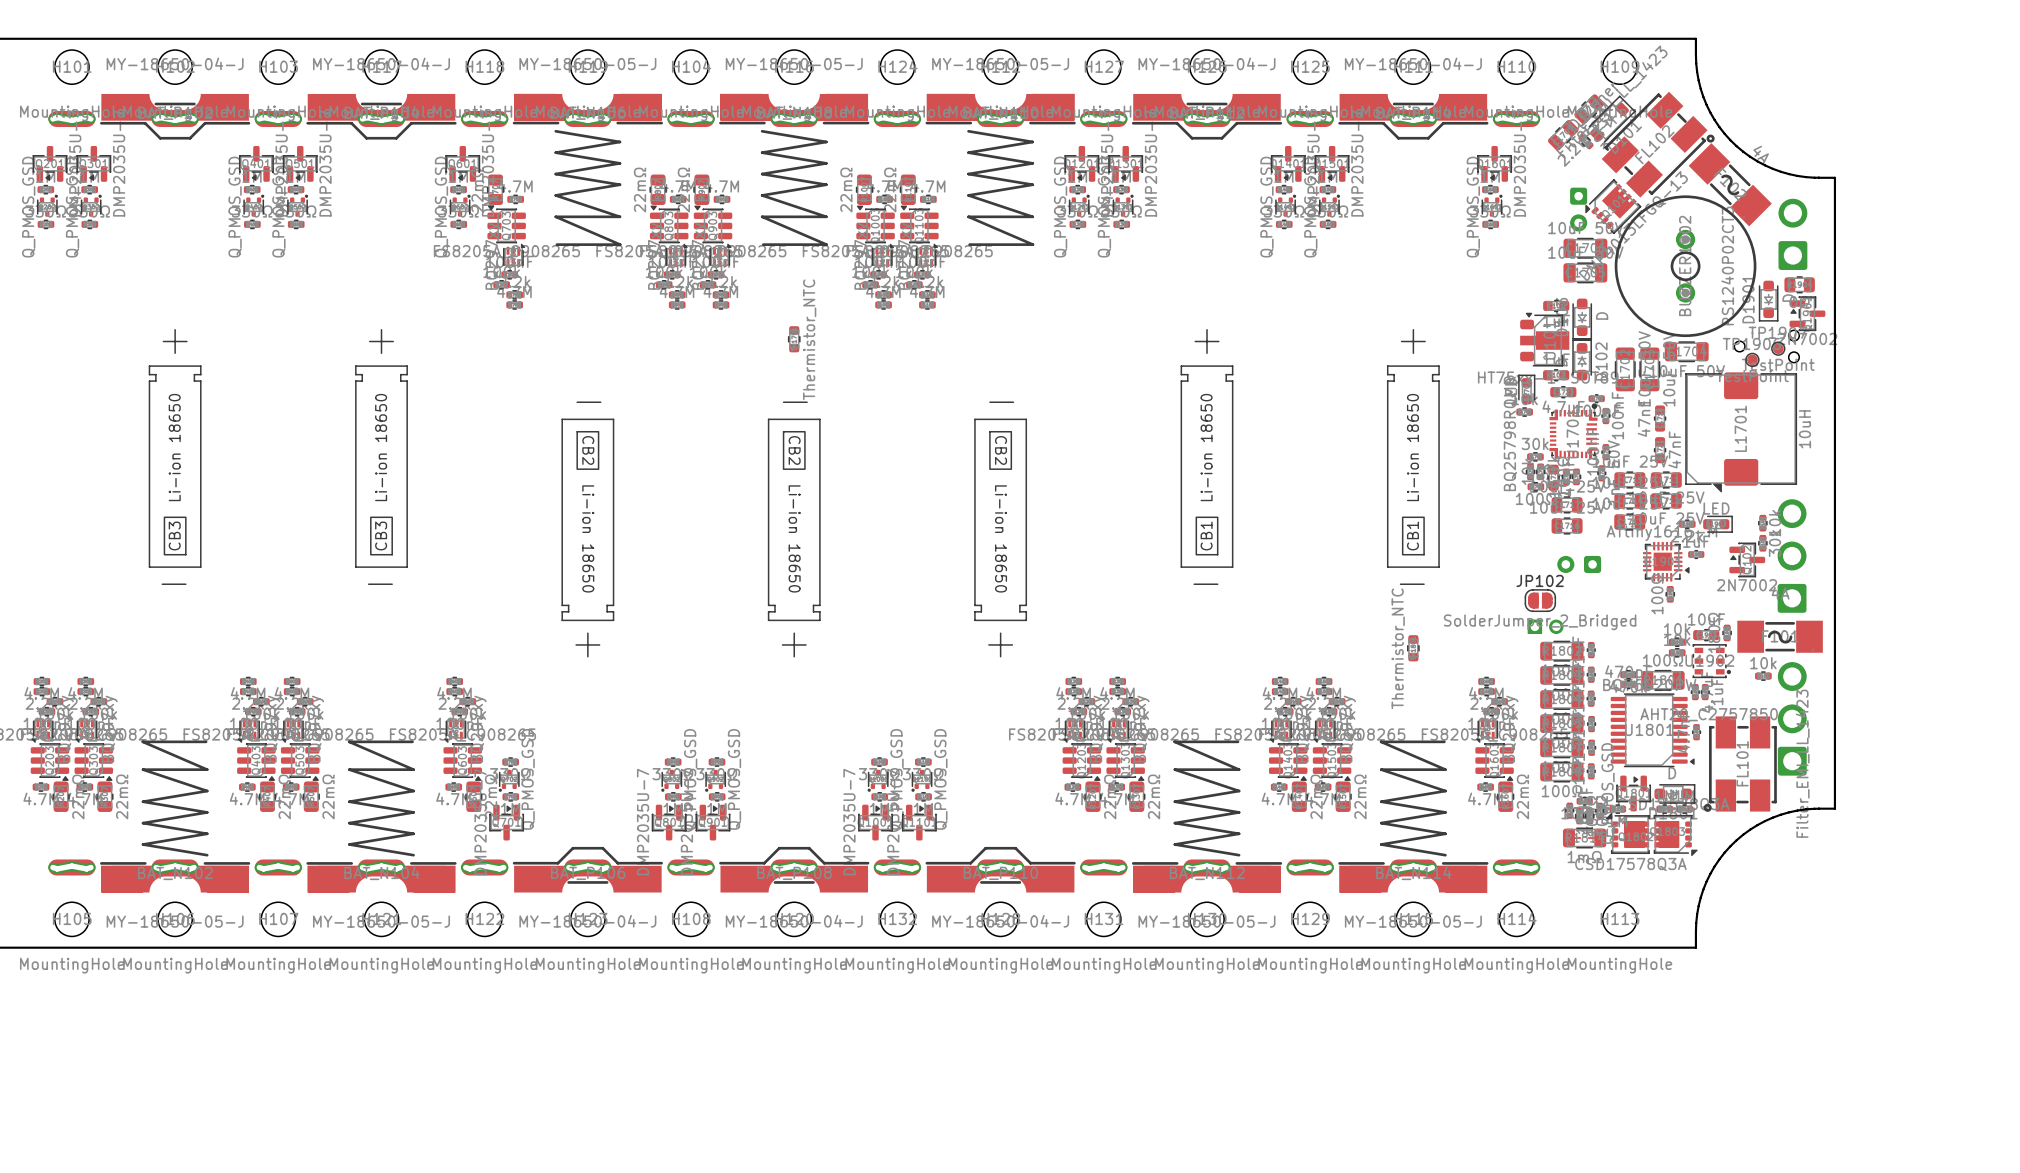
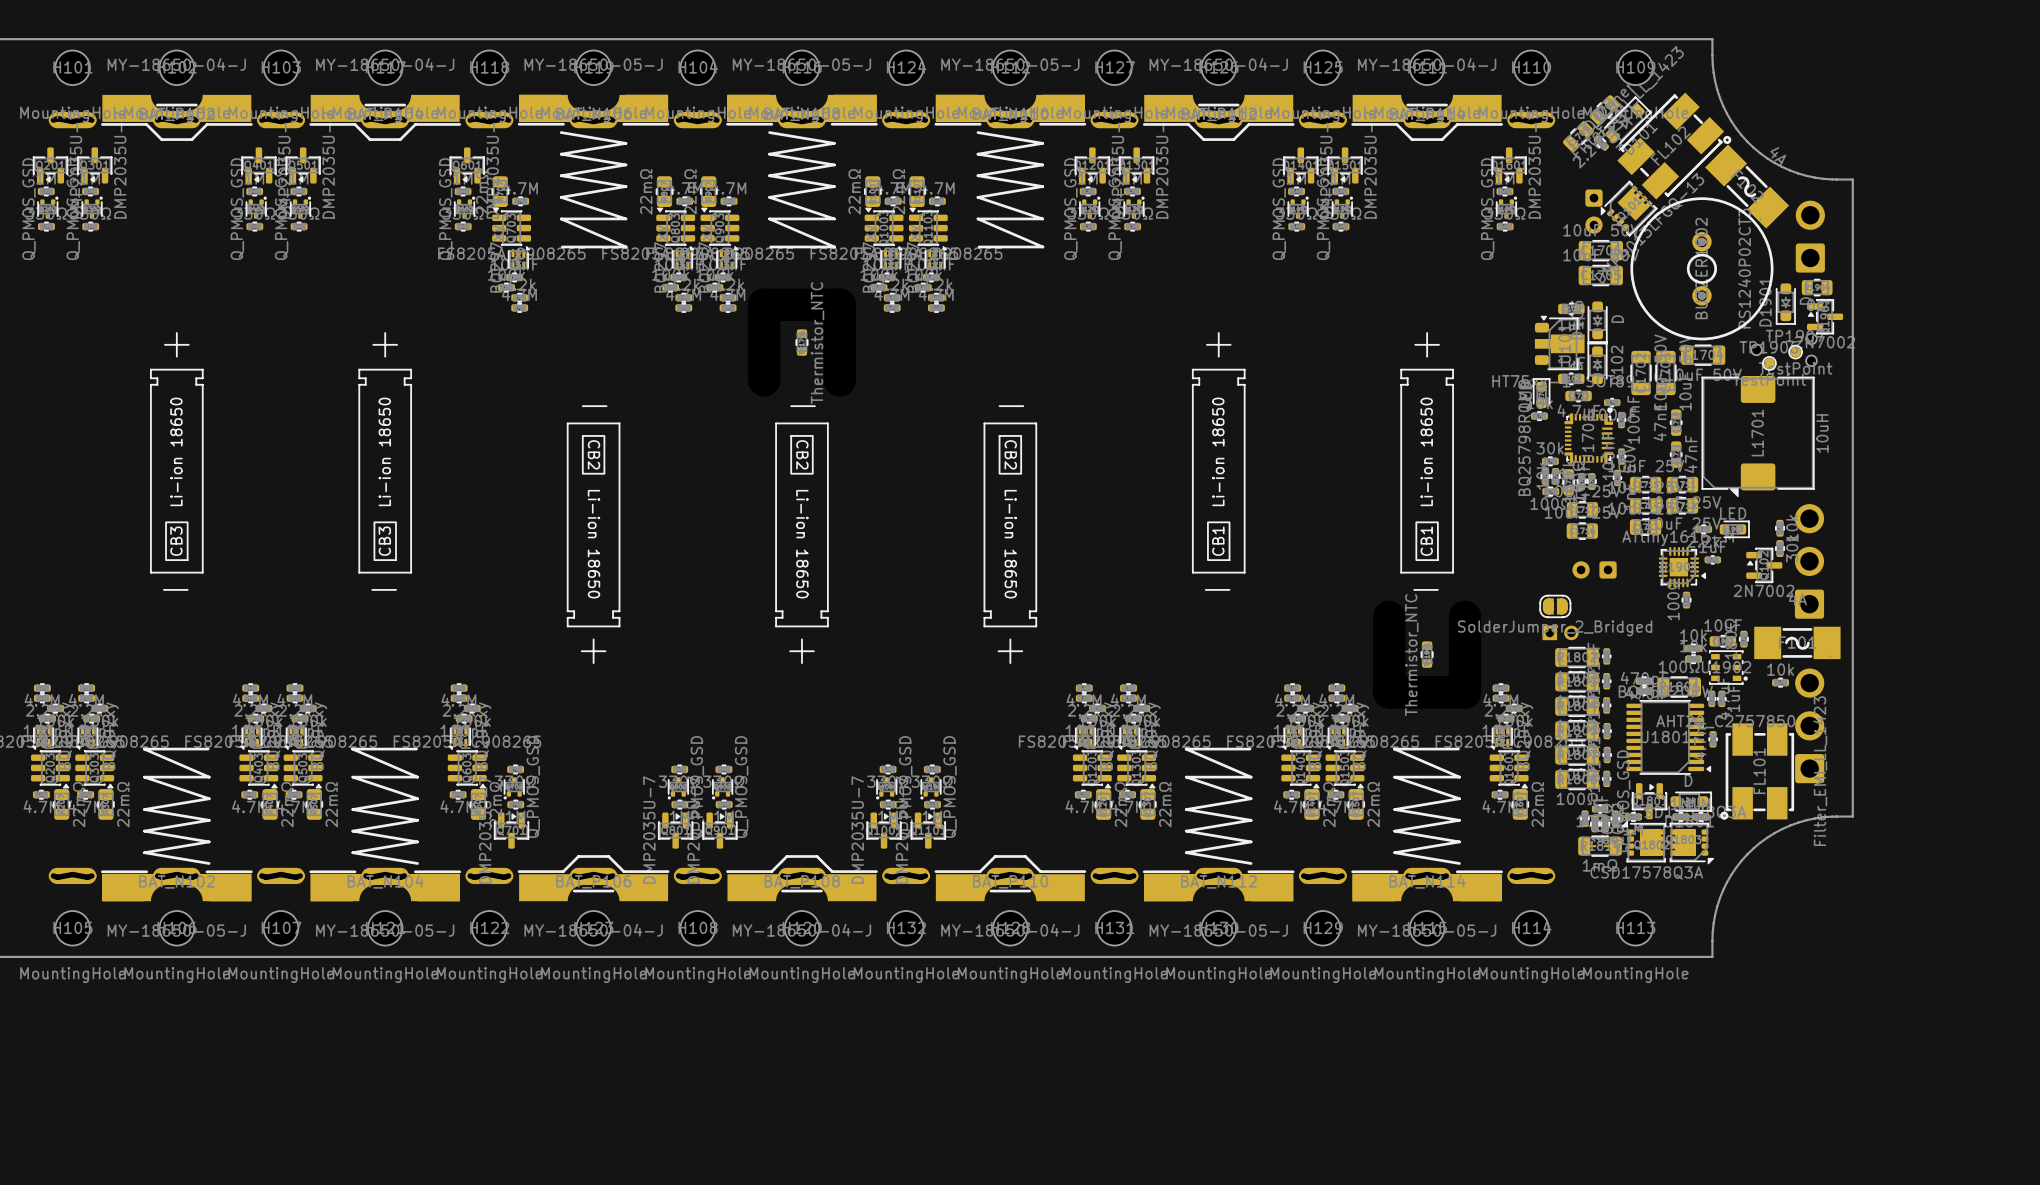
JP102 name: JP102 (1540, 580) -> none

